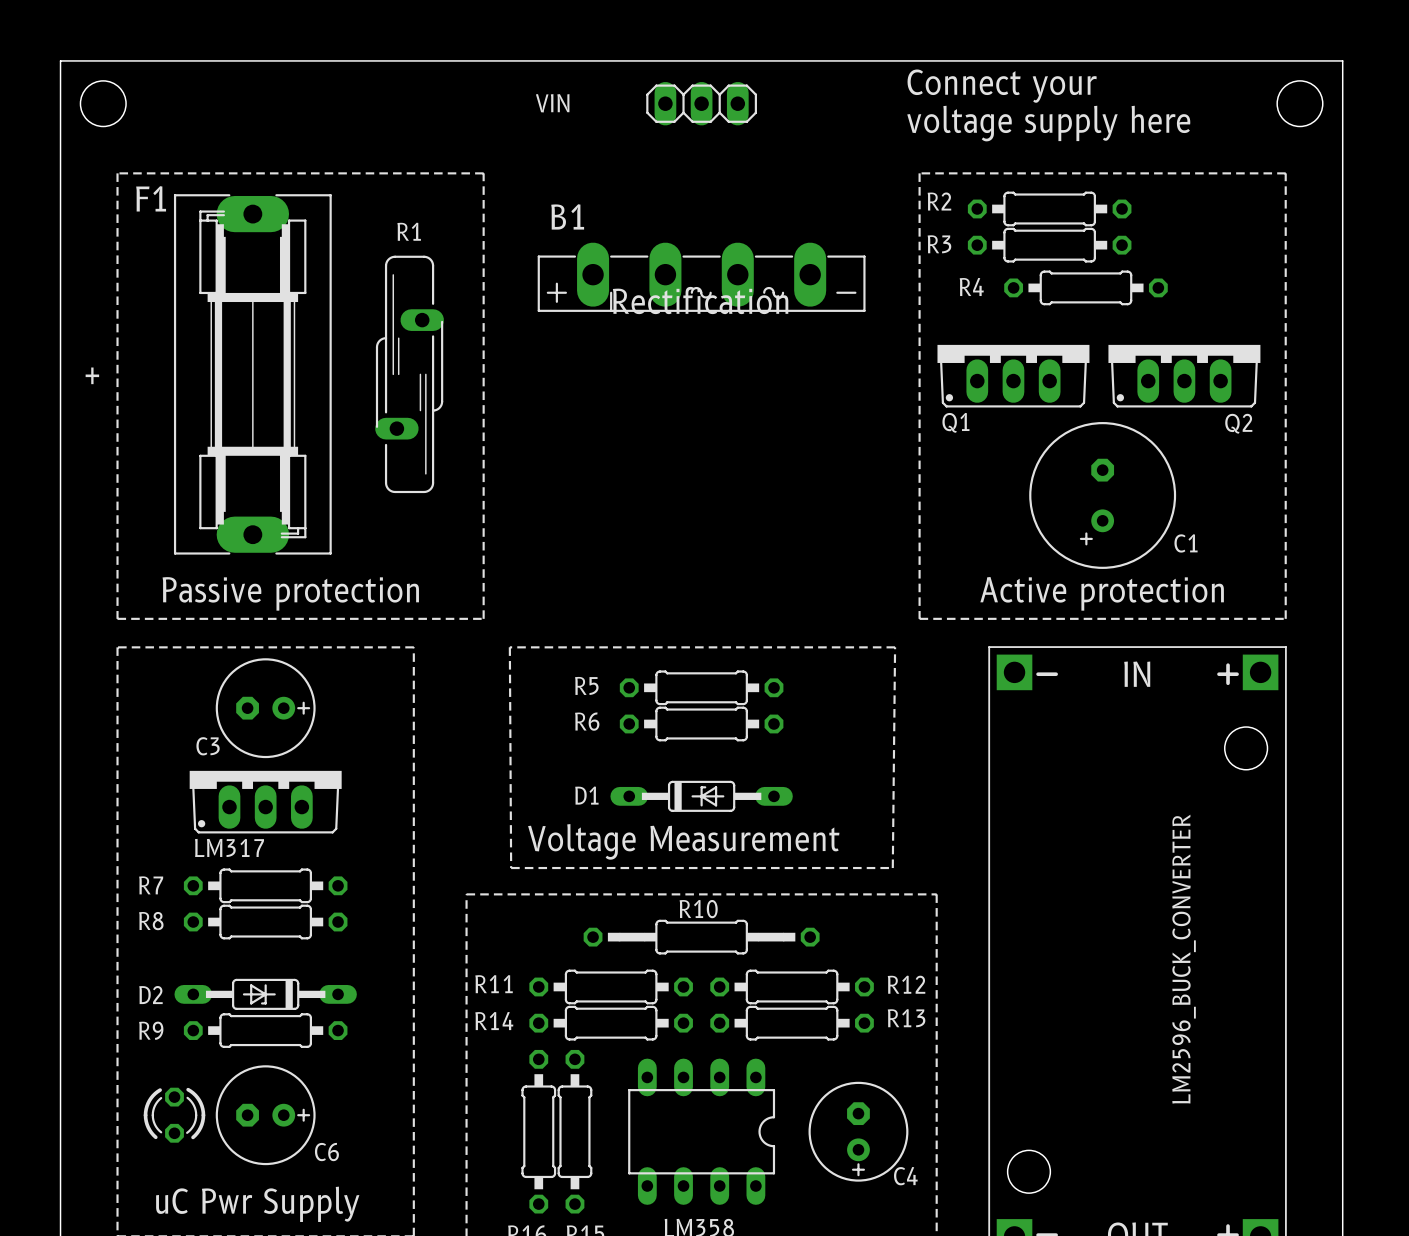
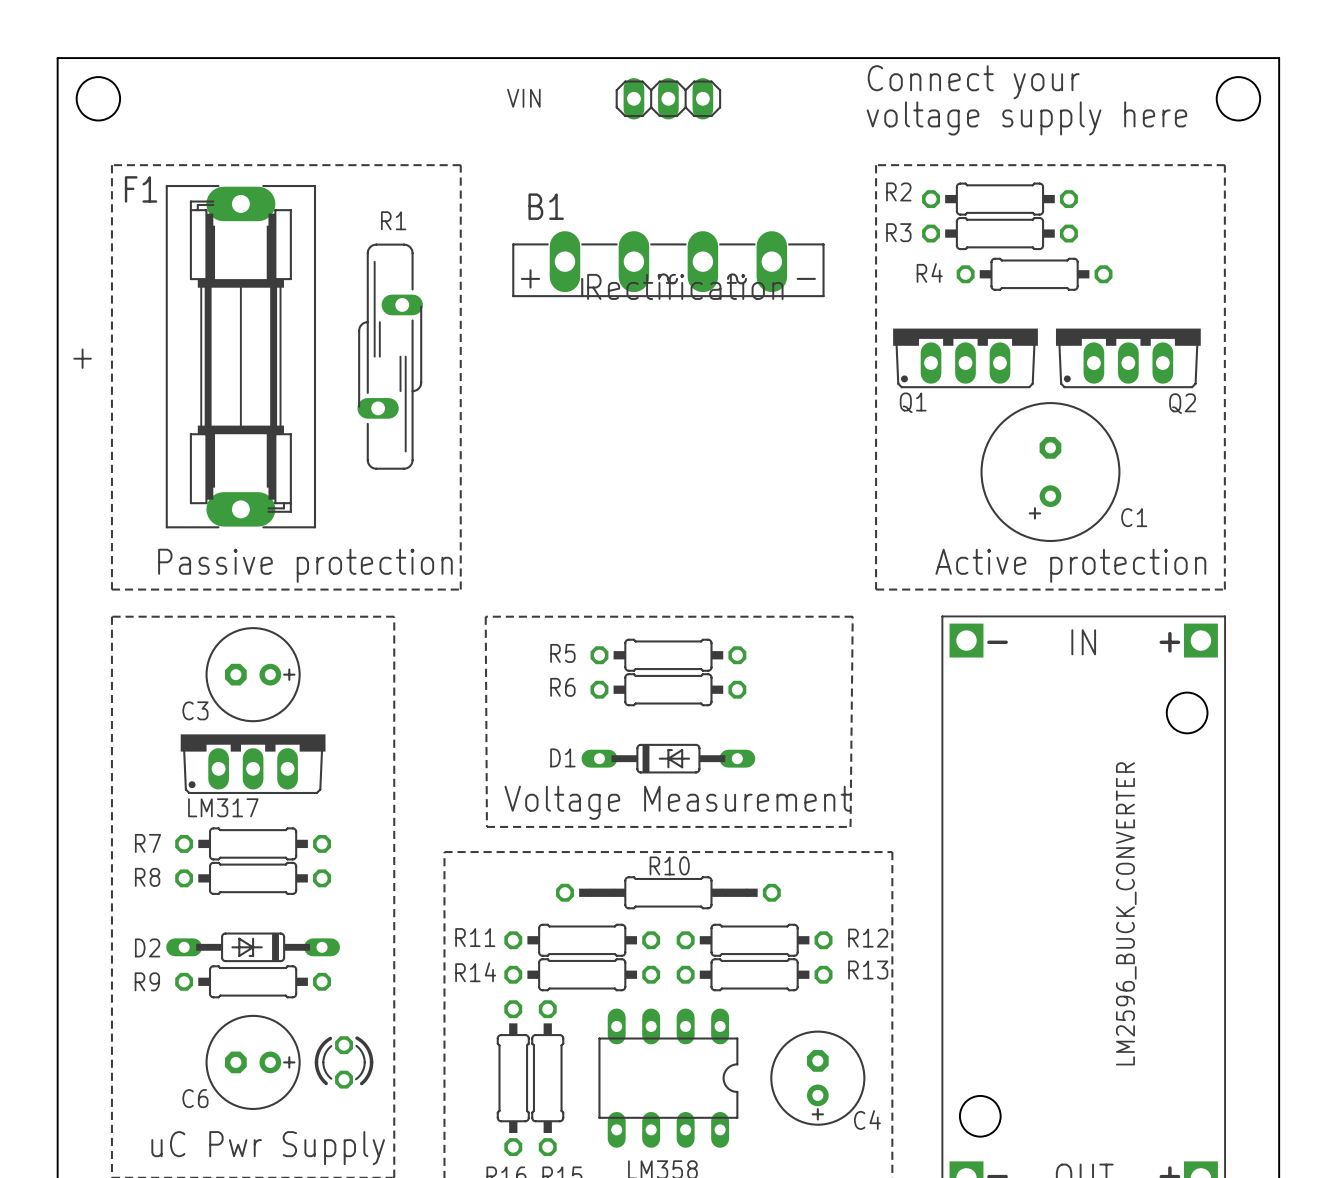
part position: (174, 1115) -> (344, 1062)
C6 name position: C6 (326, 1152) -> C6 (195, 1098)

